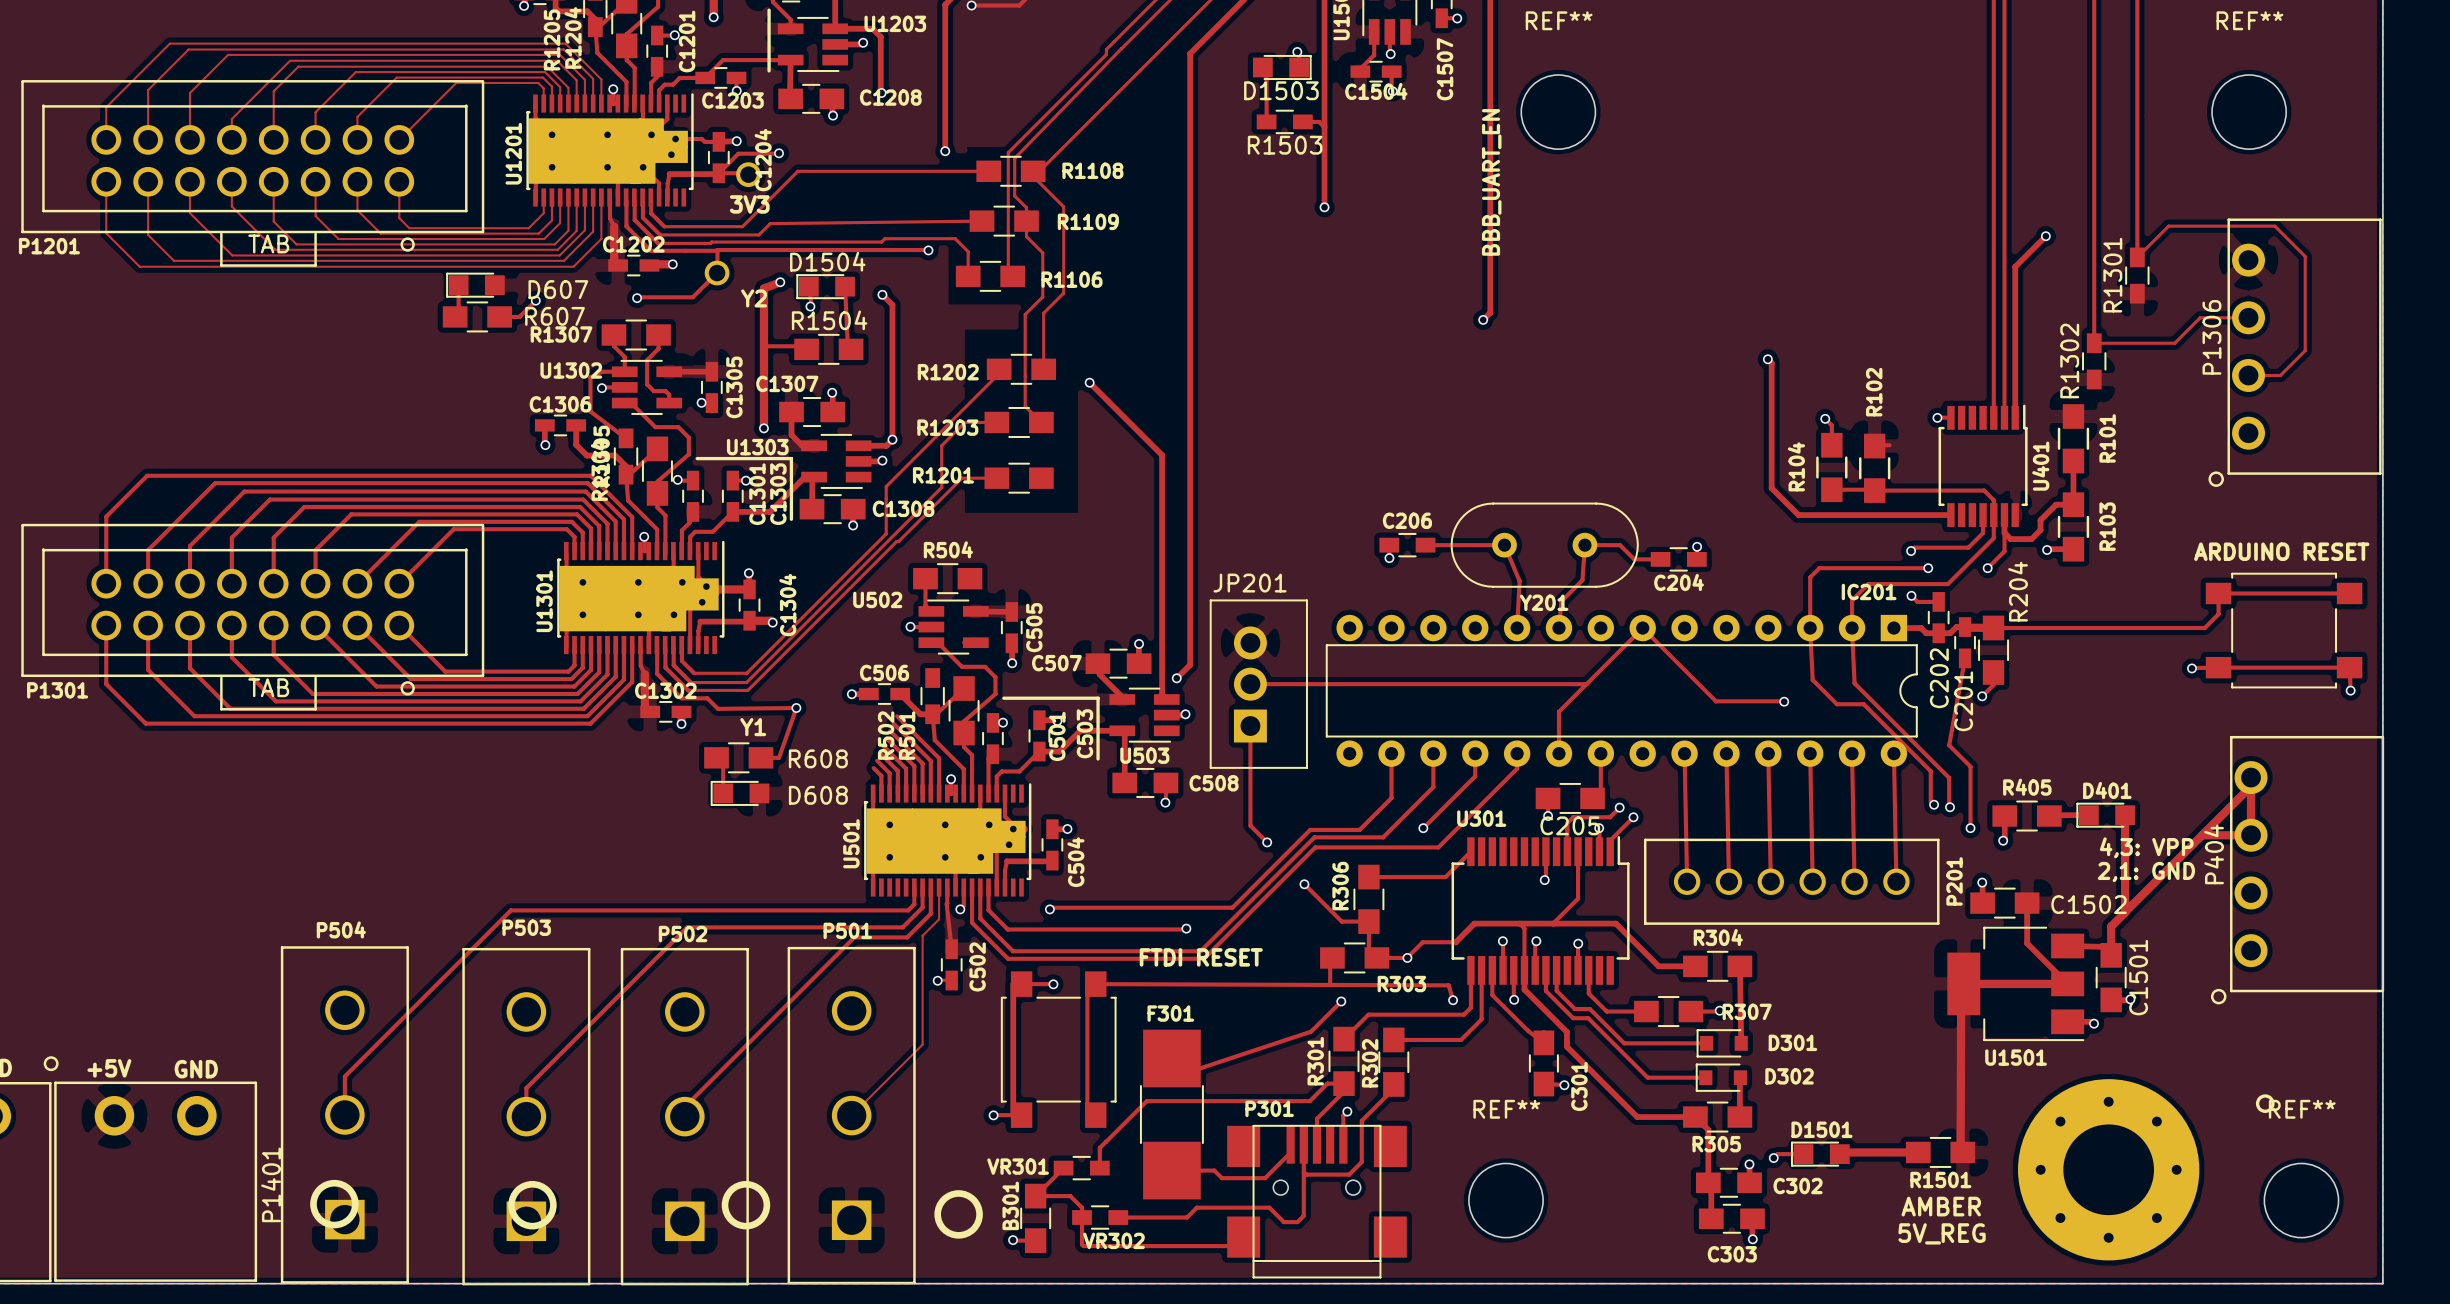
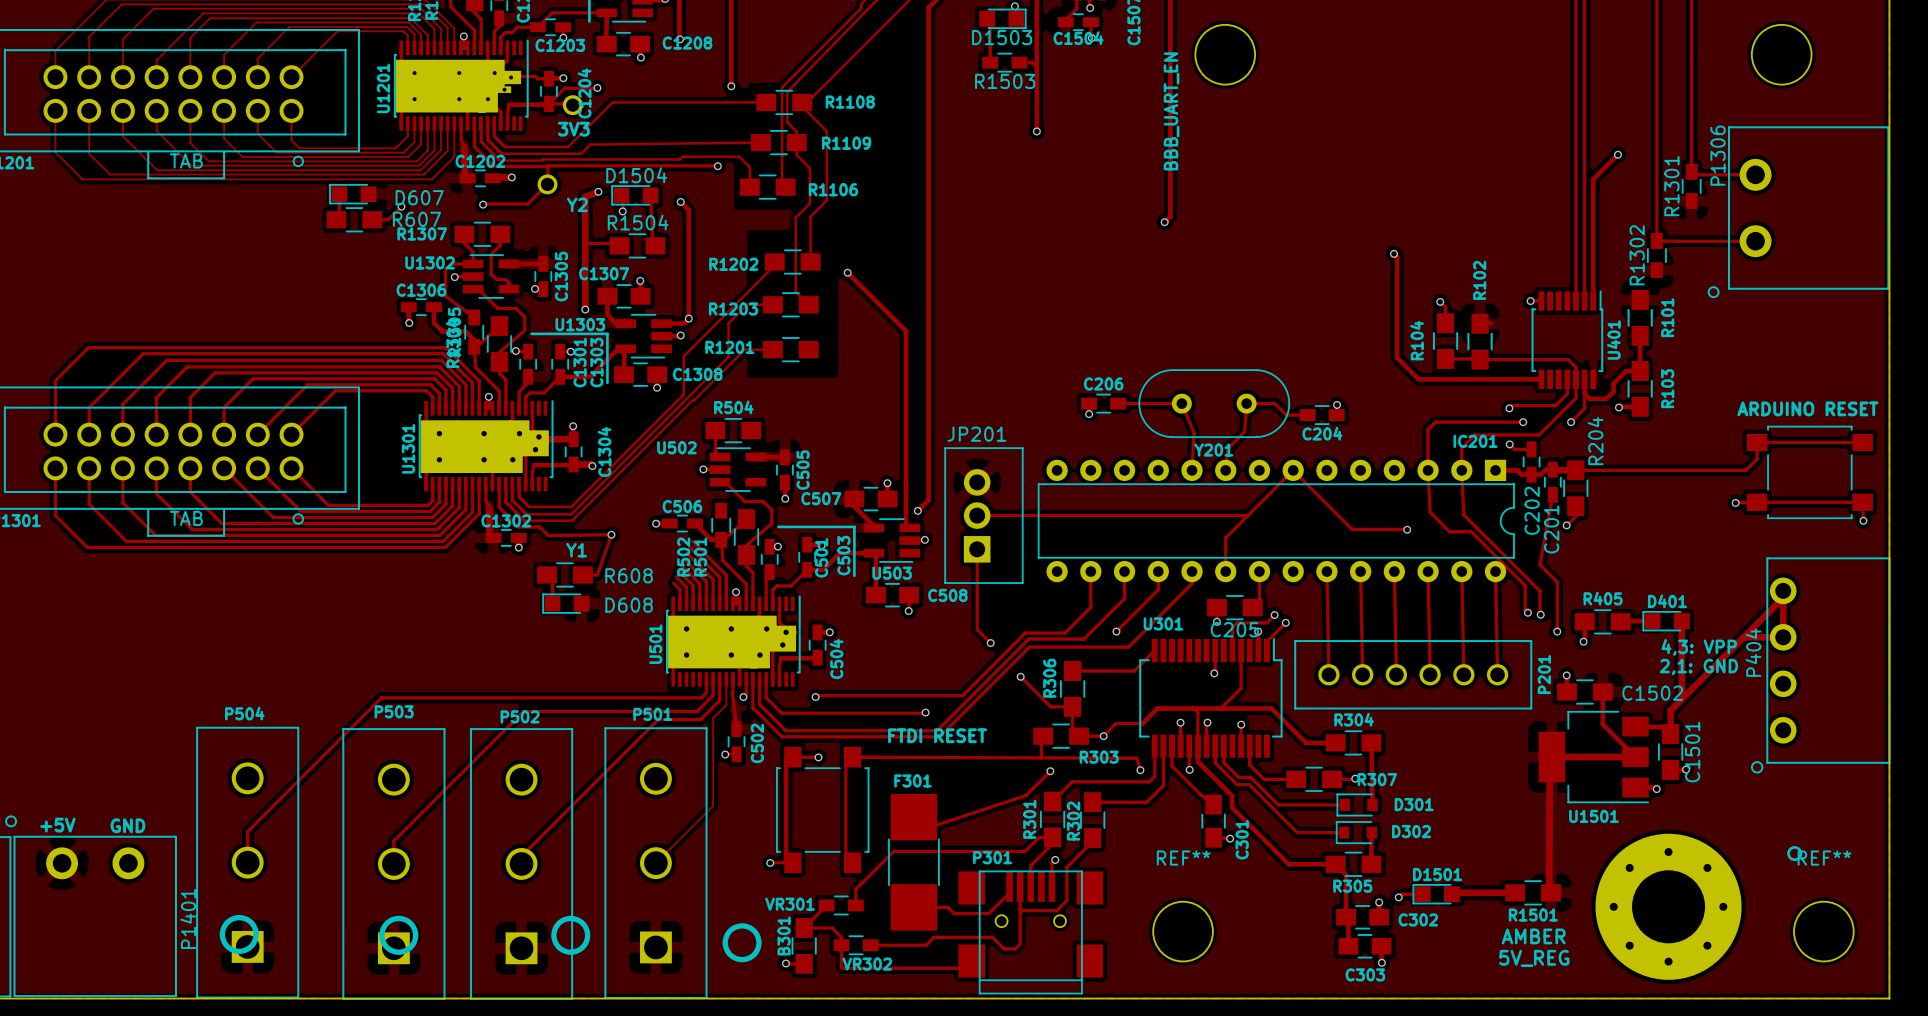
U1201 footprint: [526, 93, 694, 207] -> [393, 39, 529, 131]
P1306 footprint: [2208, 218, 2382, 487] -> [1707, 126, 1890, 299]
track: (2137, 257) (2168, 226) (2274, 226) (2305, 256) (2305, 350) (2280, 375) (2248, 375) -> none
track: none -> (1694, 174) (1755, 174)
track: (2248, 317) (2200, 317) (2174, 343) (2094, 343) -> (1755, 241) (1657, 241)
P1306 name position: P1306 (2211, 337) -> P1306 (1718, 155)

